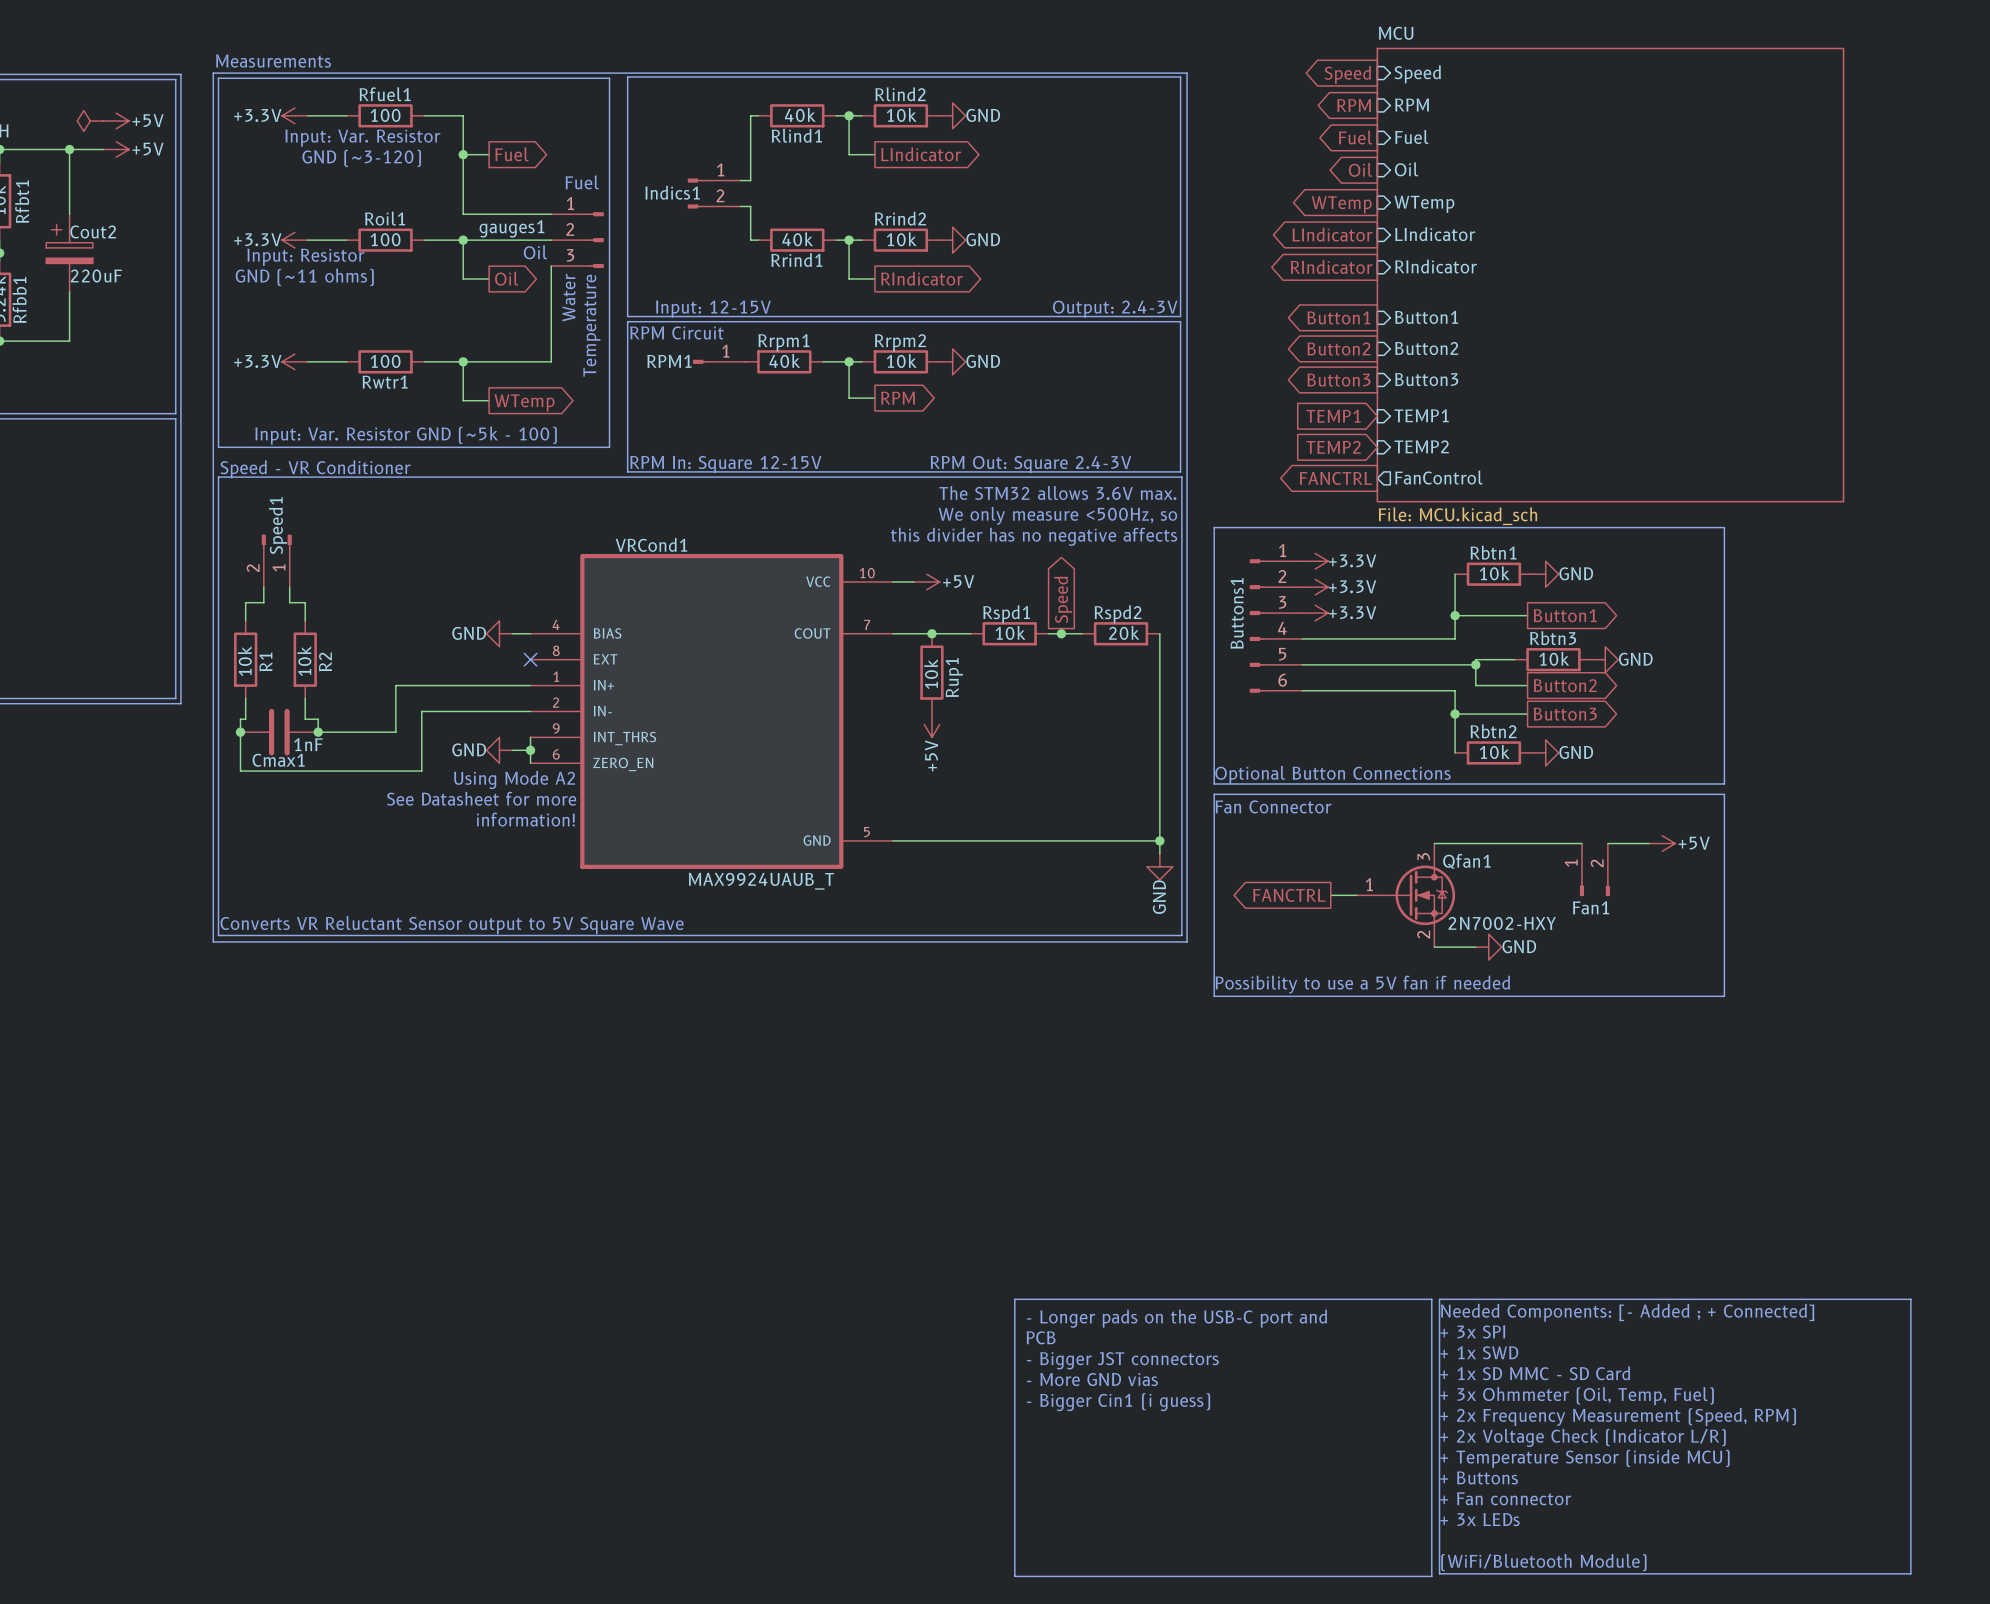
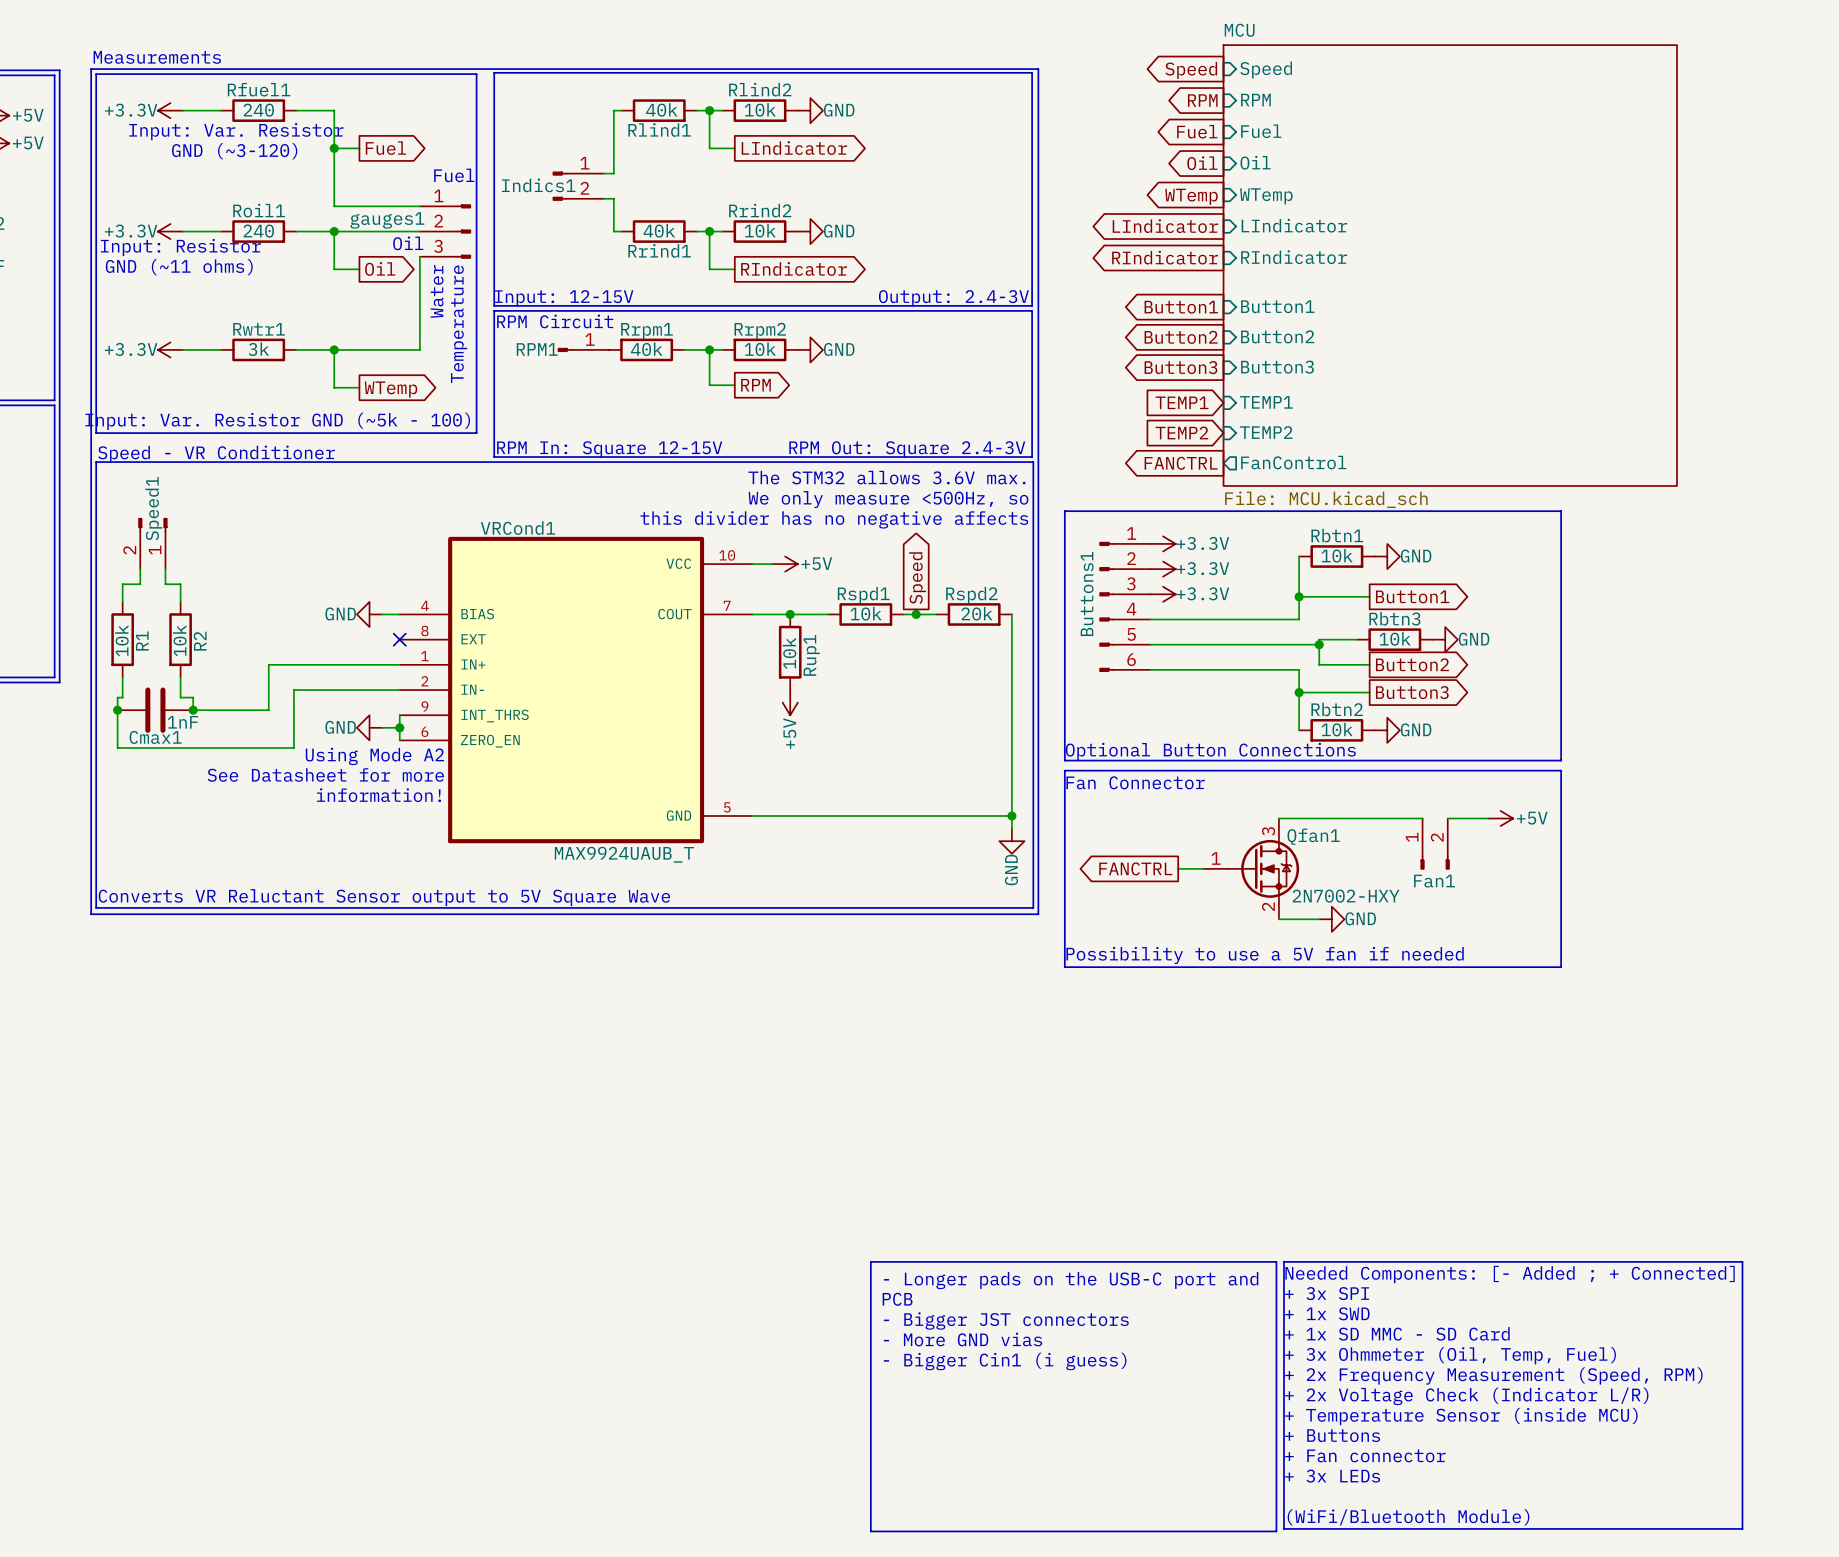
Rfuel1 value: 100 (385, 115) -> 240 (258, 110)
Roil1 value: 100 (385, 239) -> 240 (258, 231)
Rwtr1 value: 100 (385, 361) -> 3k (258, 349)
Rwtr1 name position: Rwtr1 (385, 382) -> Rwtr1 (259, 329)

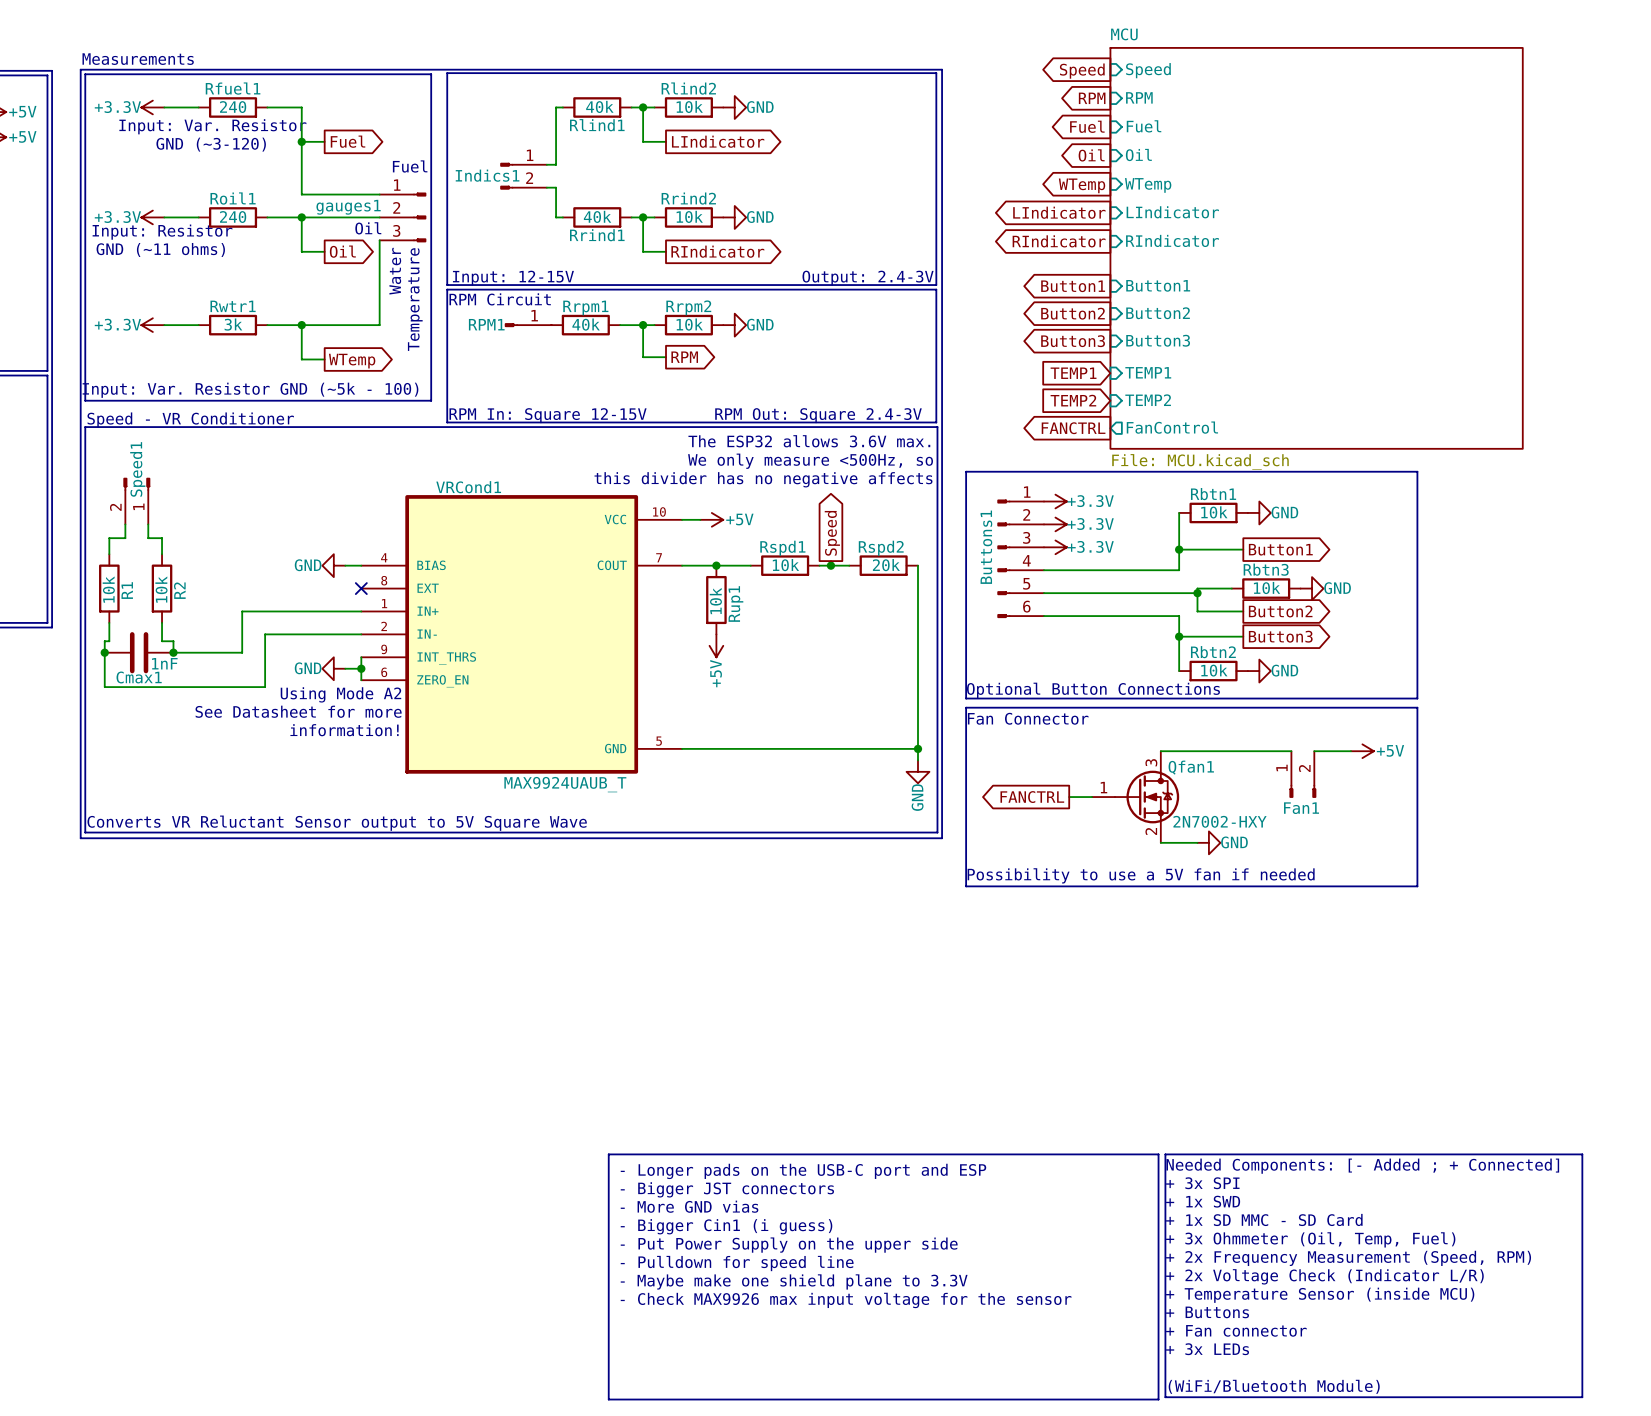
text: The STM32 allows 3.6V max. (886, 477) -> The ESP32 allows 3.6V max. (809, 441)
line: (870, 1261) (870, 1531) -> (789, 1154) (608, 1154) (608, 1399) (789, 1399)
text: - Longer pads on the USB-C port and (1071, 1280) -> - Longer pads on the USB-C port and ESP (803, 1171)
text: PCB (897, 1299) -> none
text position: - Bigger JST connectors (1006, 1321) -> - Bigger JST connectors (727, 1189)
text position: - More GND vias (962, 1339) -> - More GND vias (689, 1206)
text: none -> - Put Power Supply on the upper side (789, 1245)
text position: - Bigger Cin1 (i guess) (1005, 1361) -> - Bigger Cin1 (i guess) (726, 1226)
text: none -> - Pulldown for speed line (737, 1263)
text: none -> - Maybe make one shield plane to 3.3V (794, 1281)
text: none -> - Check MAX9926 max input voltage for the sensor (846, 1300)

